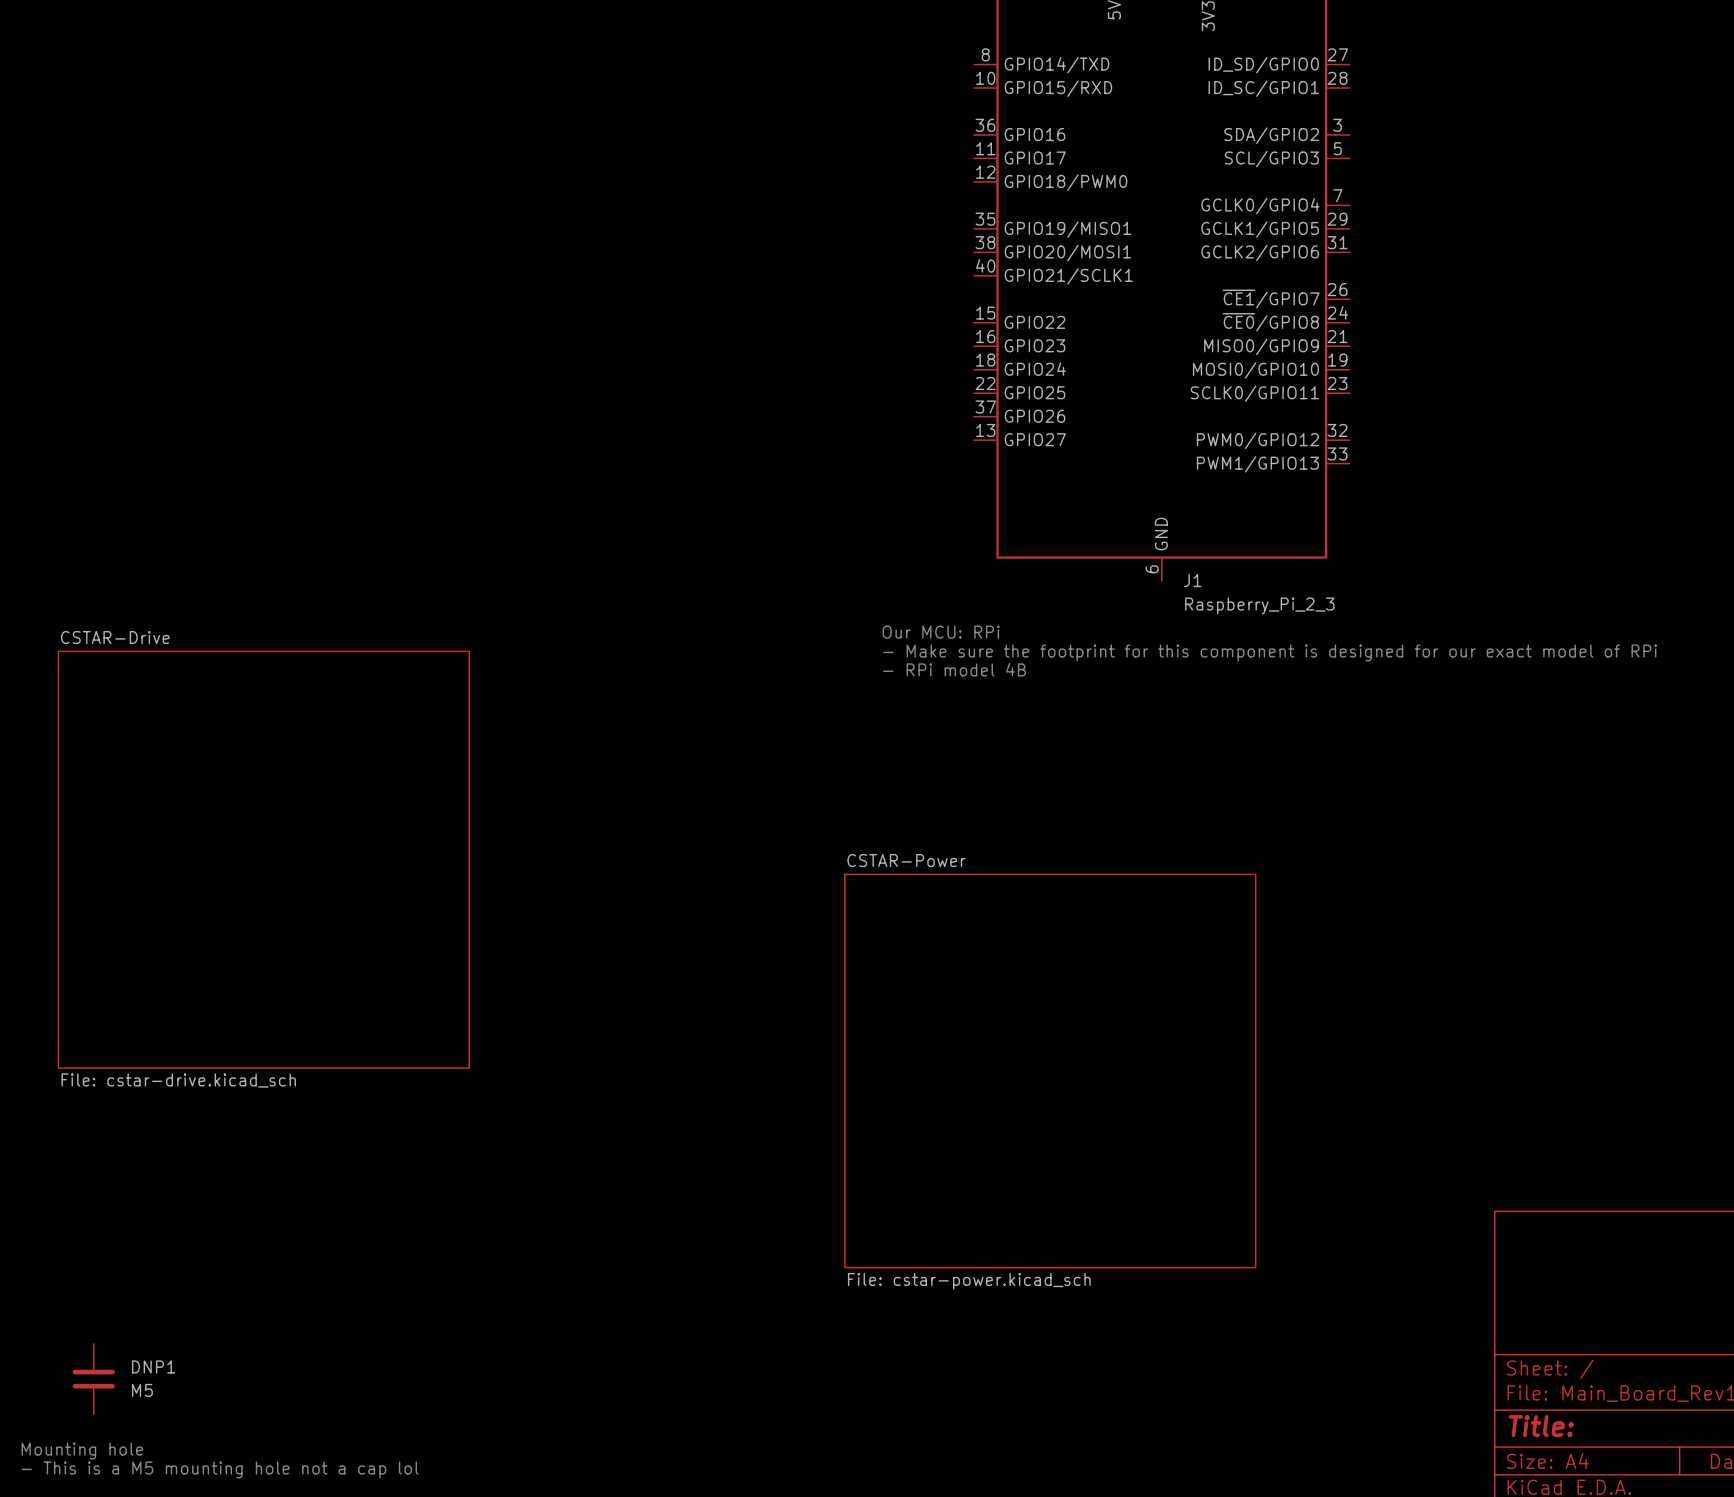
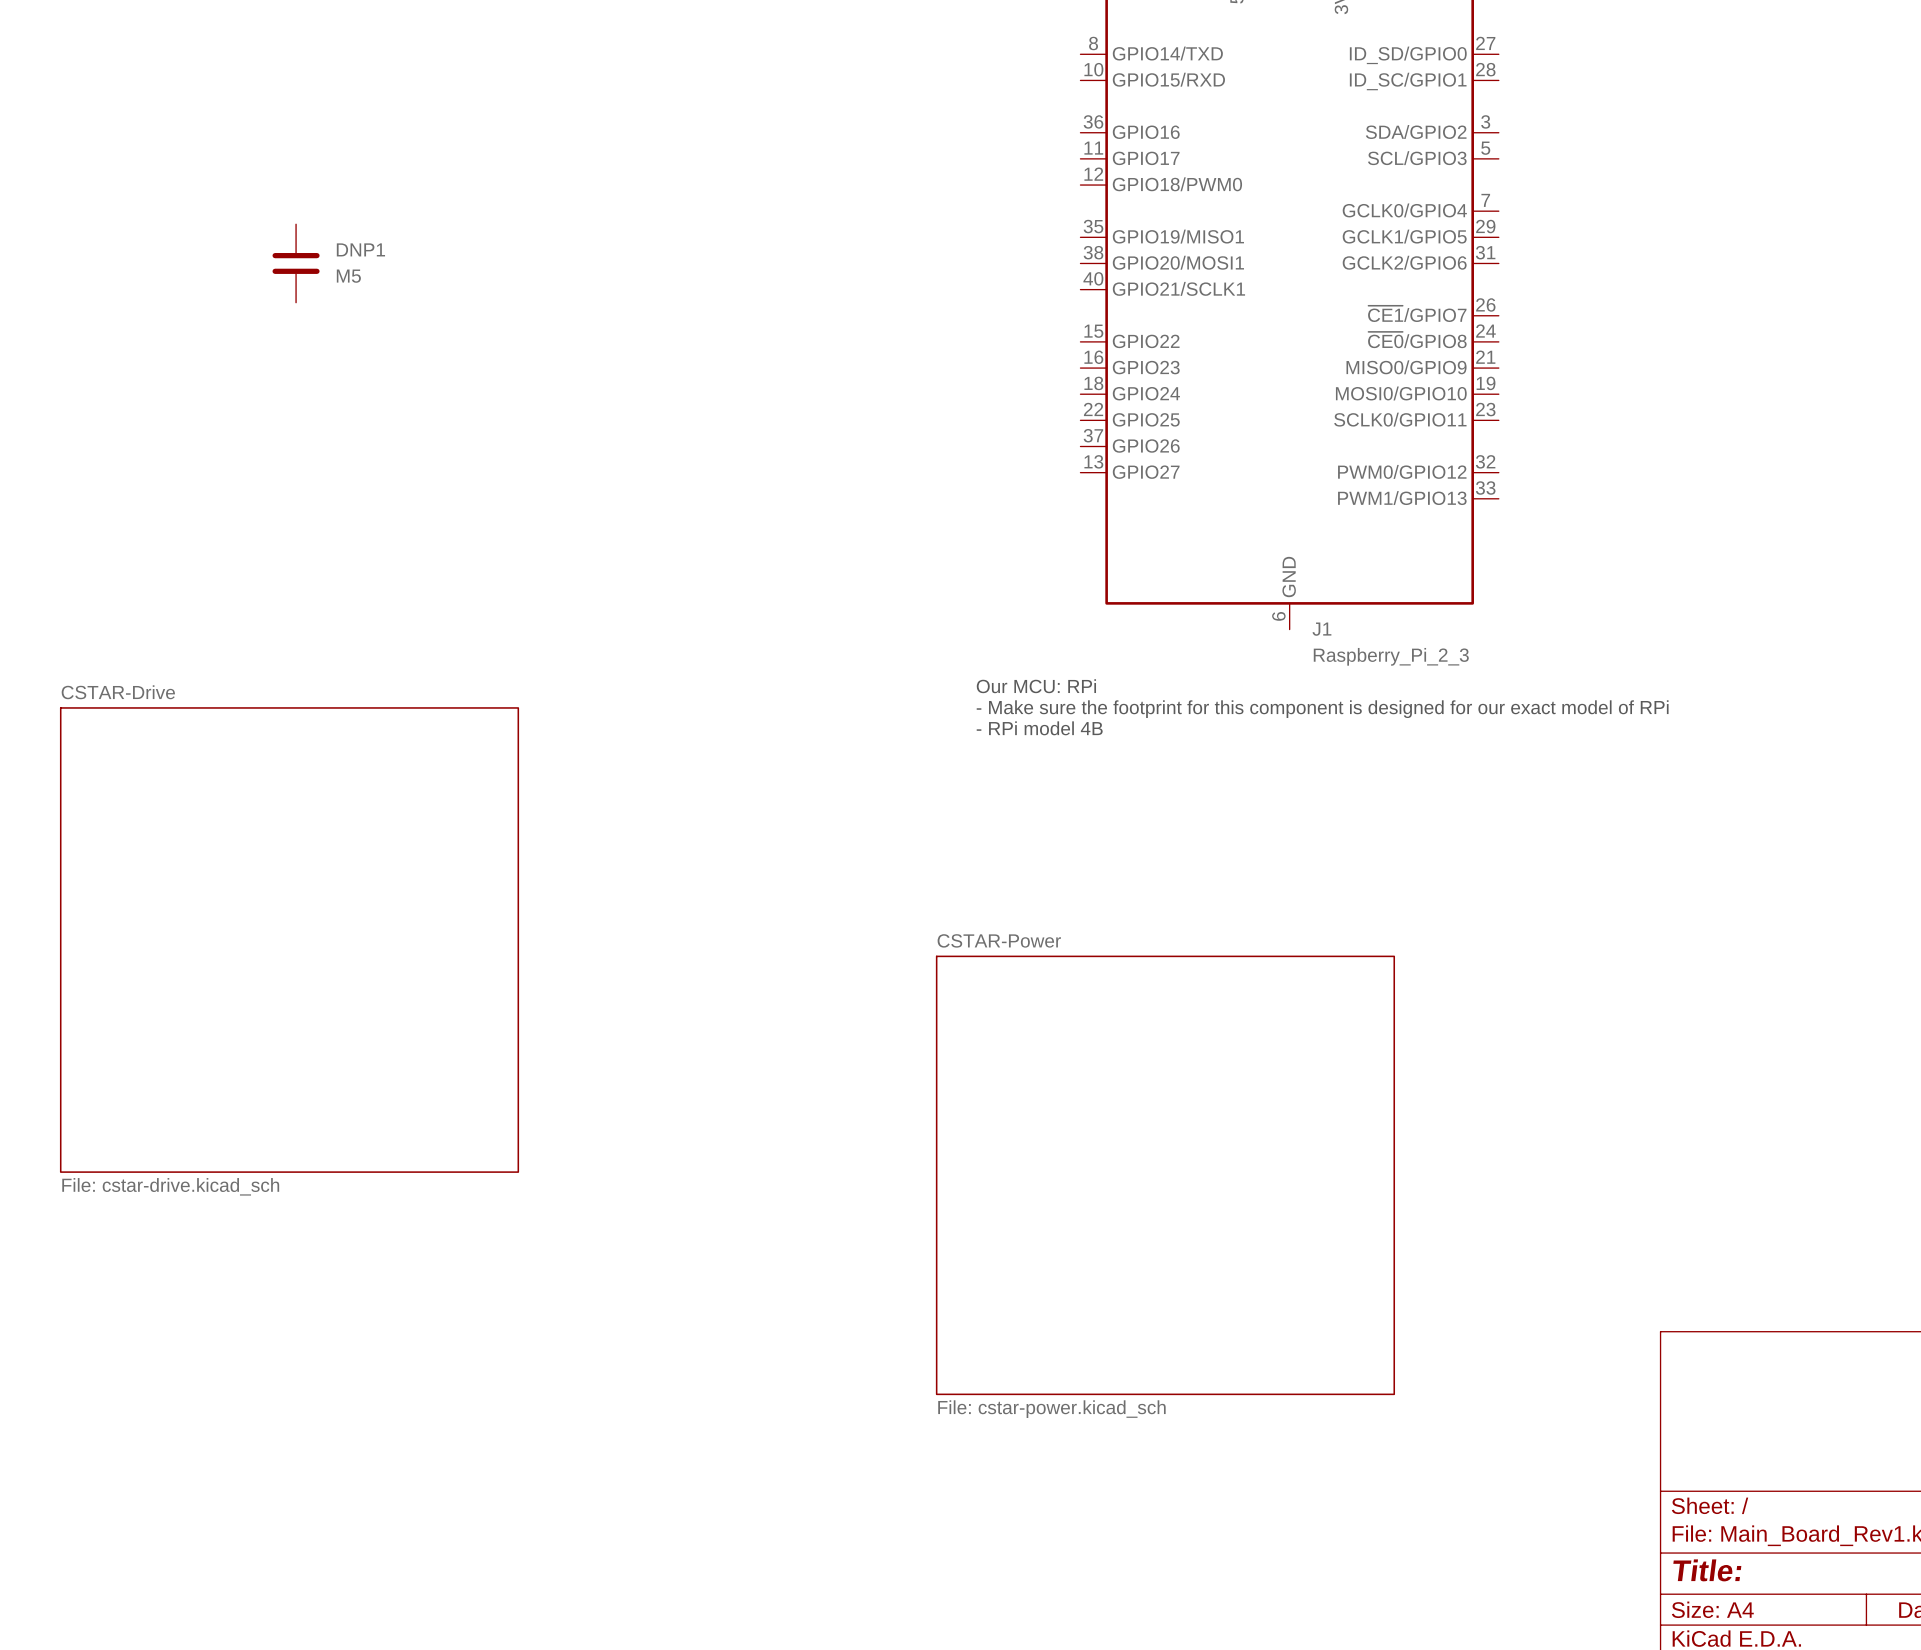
DNP1 position: (93, 1379) -> (296, 263)
text: Mounting hole (82, 1451) -> none
text: - This is a M5 mounting hole not a cap lol (220, 1469) -> none

